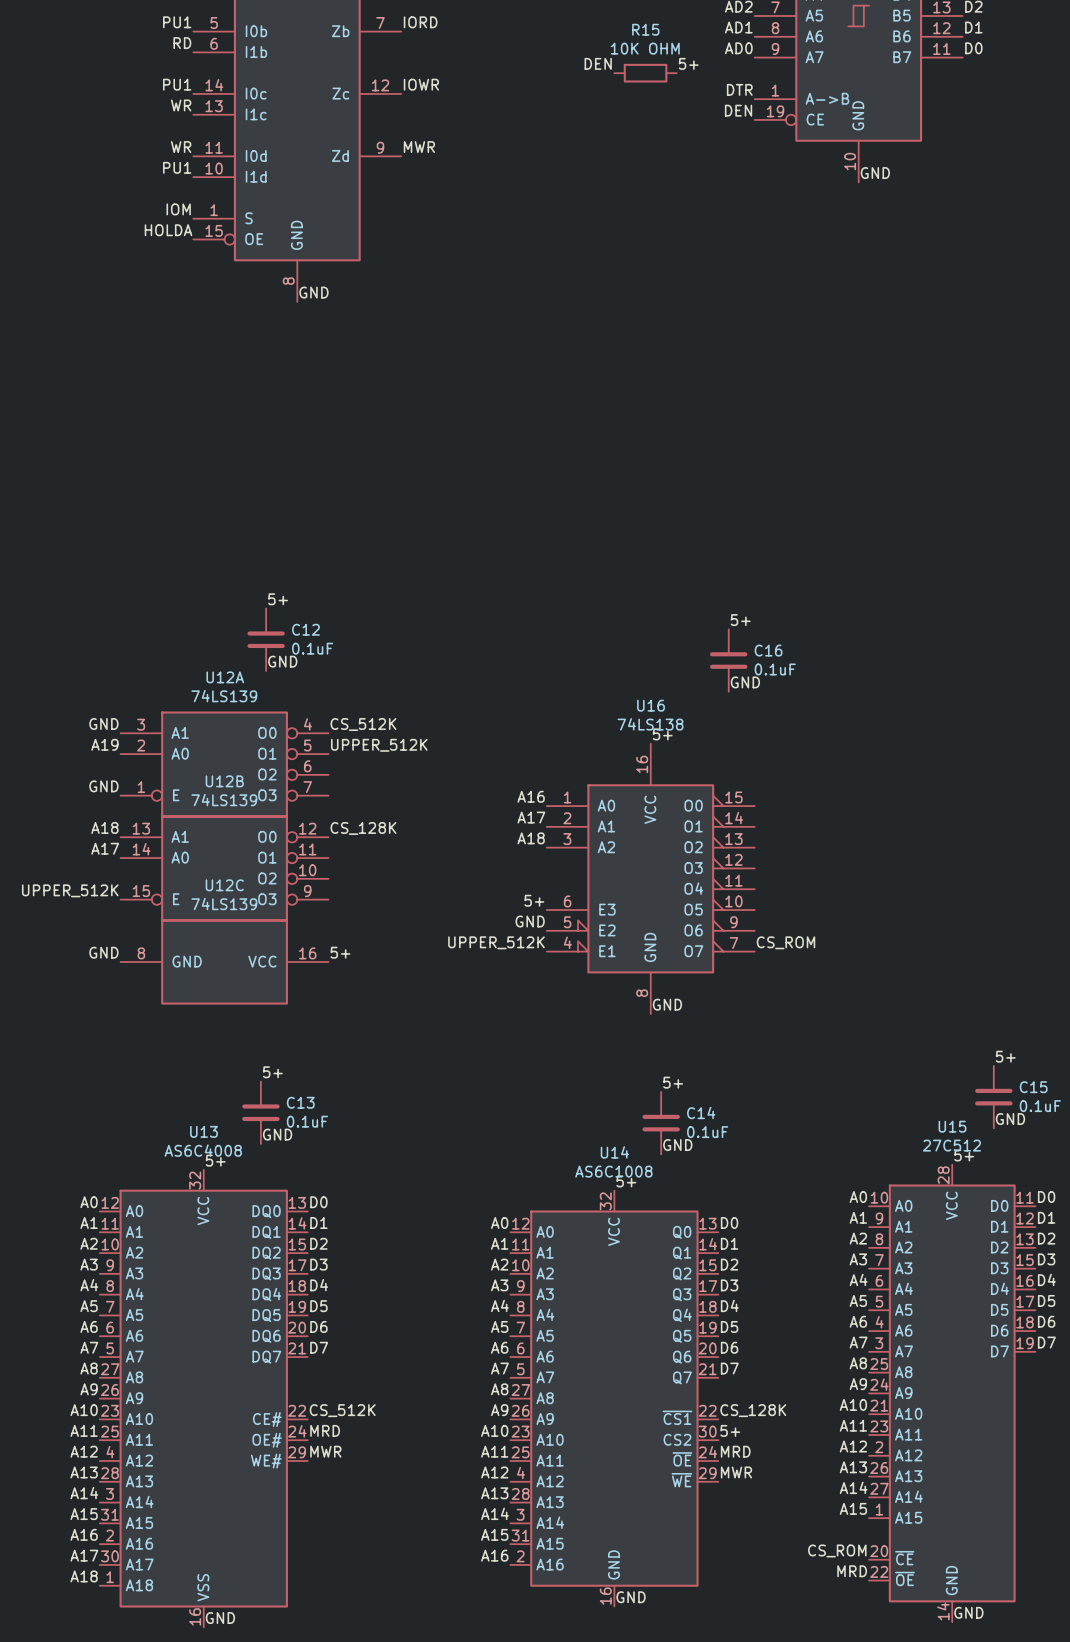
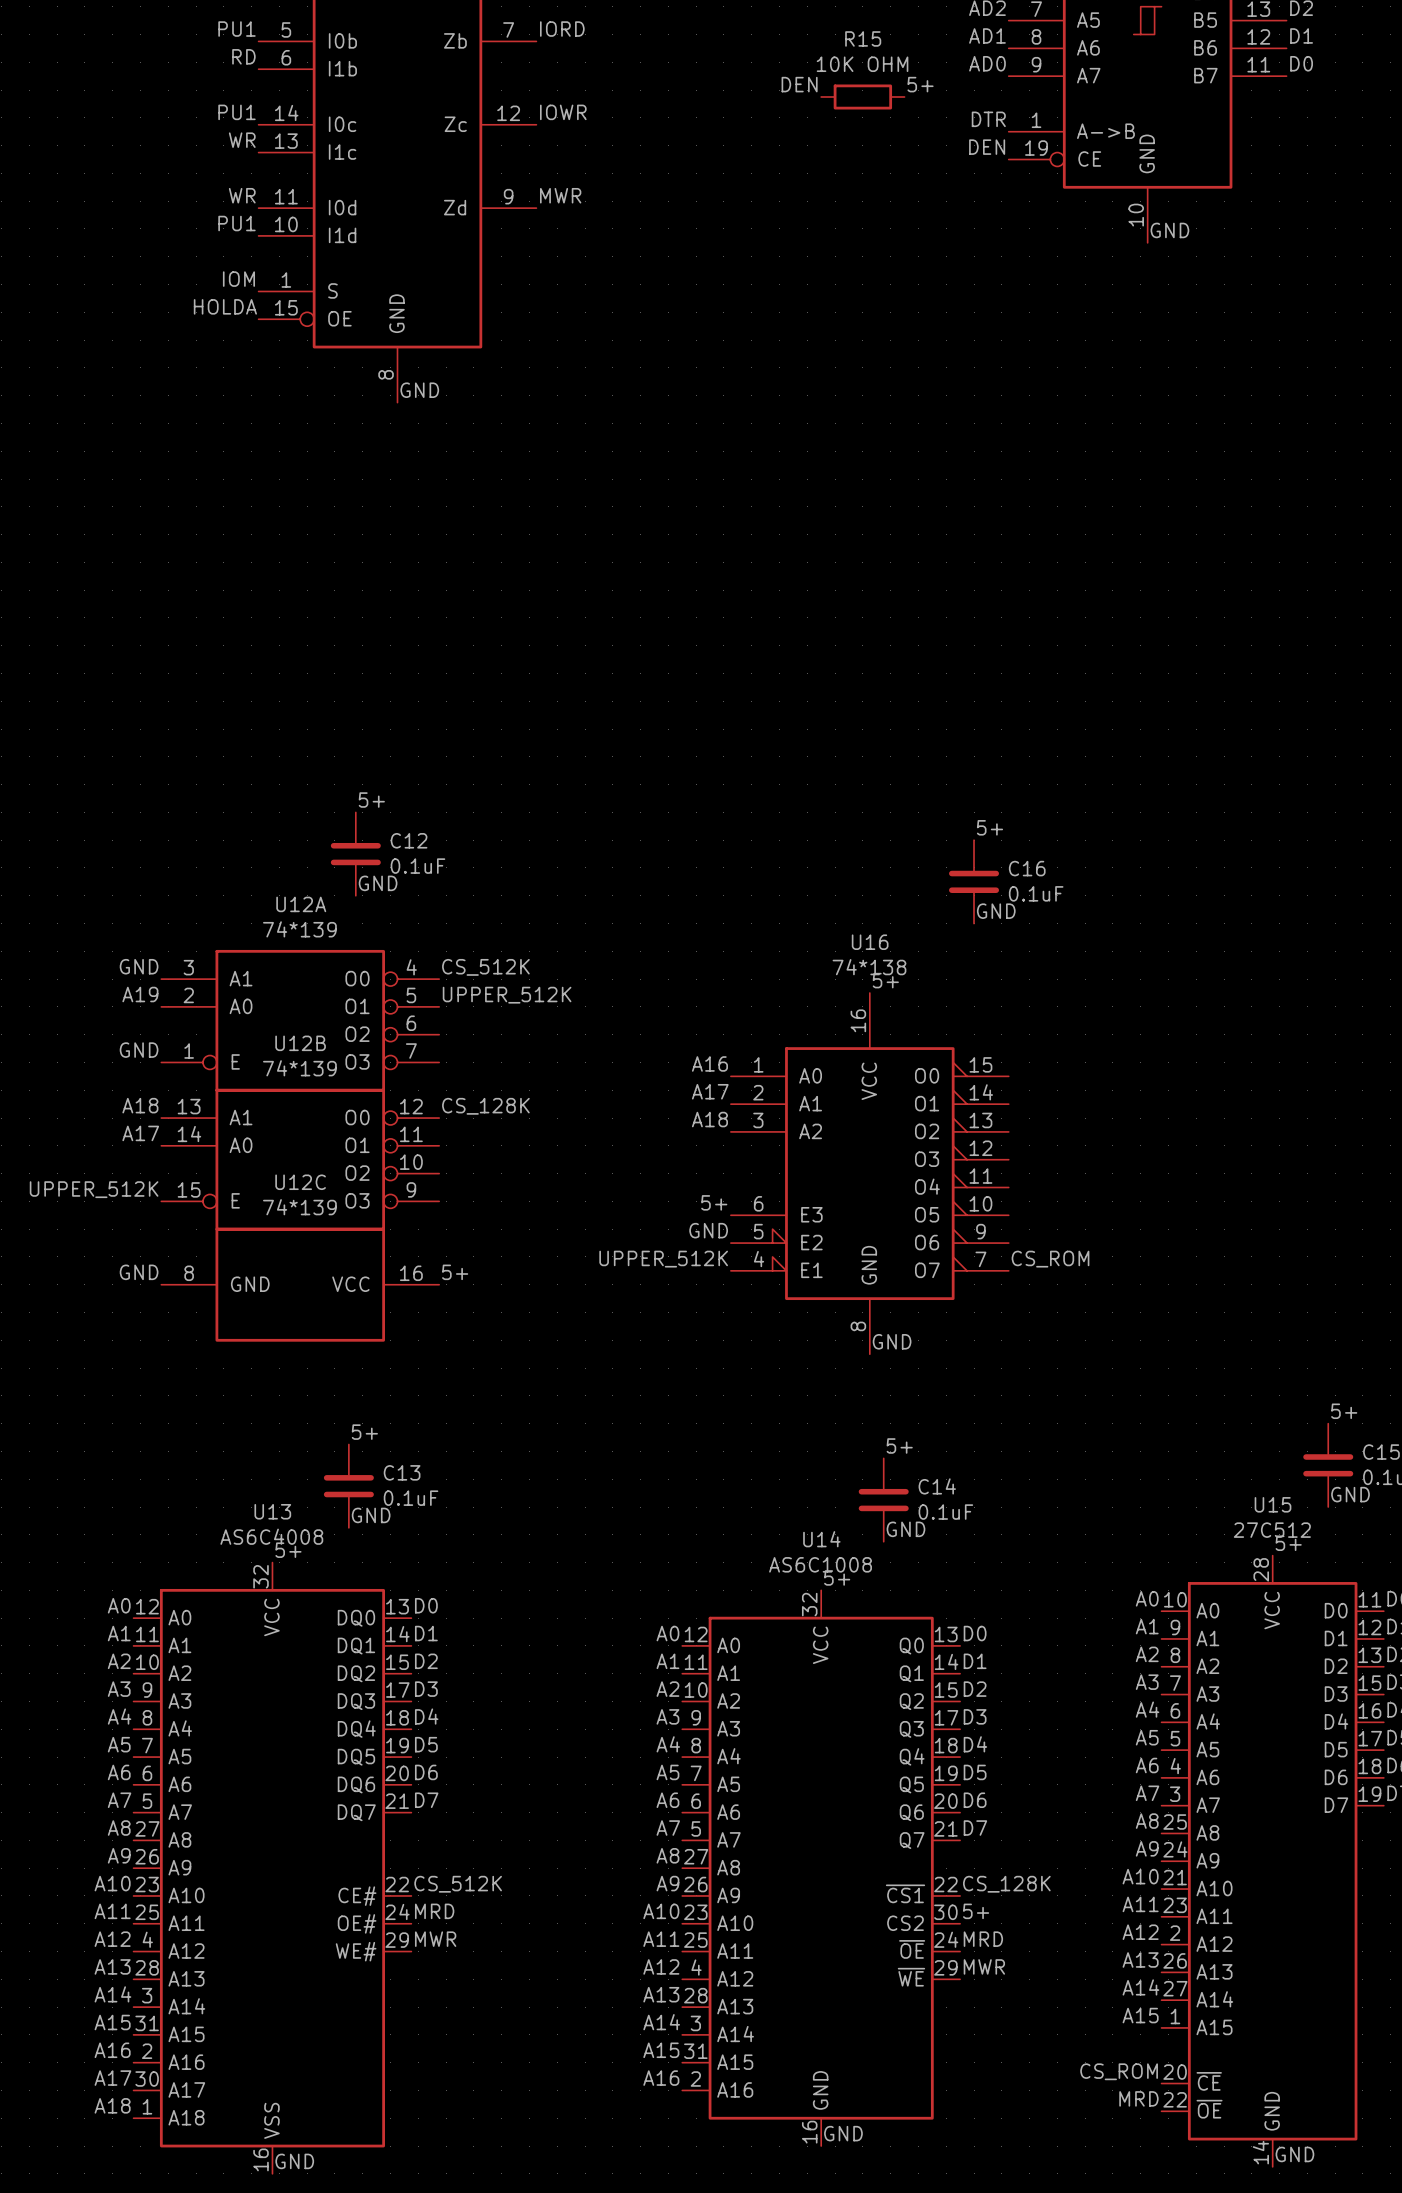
U12A value: 74LS139 (224, 696) -> 74*139 (299, 929)
U16 value: 74LS138 (650, 724) -> 74*138 (869, 967)
U12B value: 74LS139 (224, 800) -> 74*139 (299, 1068)
U12C value: 74LS139 (224, 903) -> 74*139 (299, 1207)

